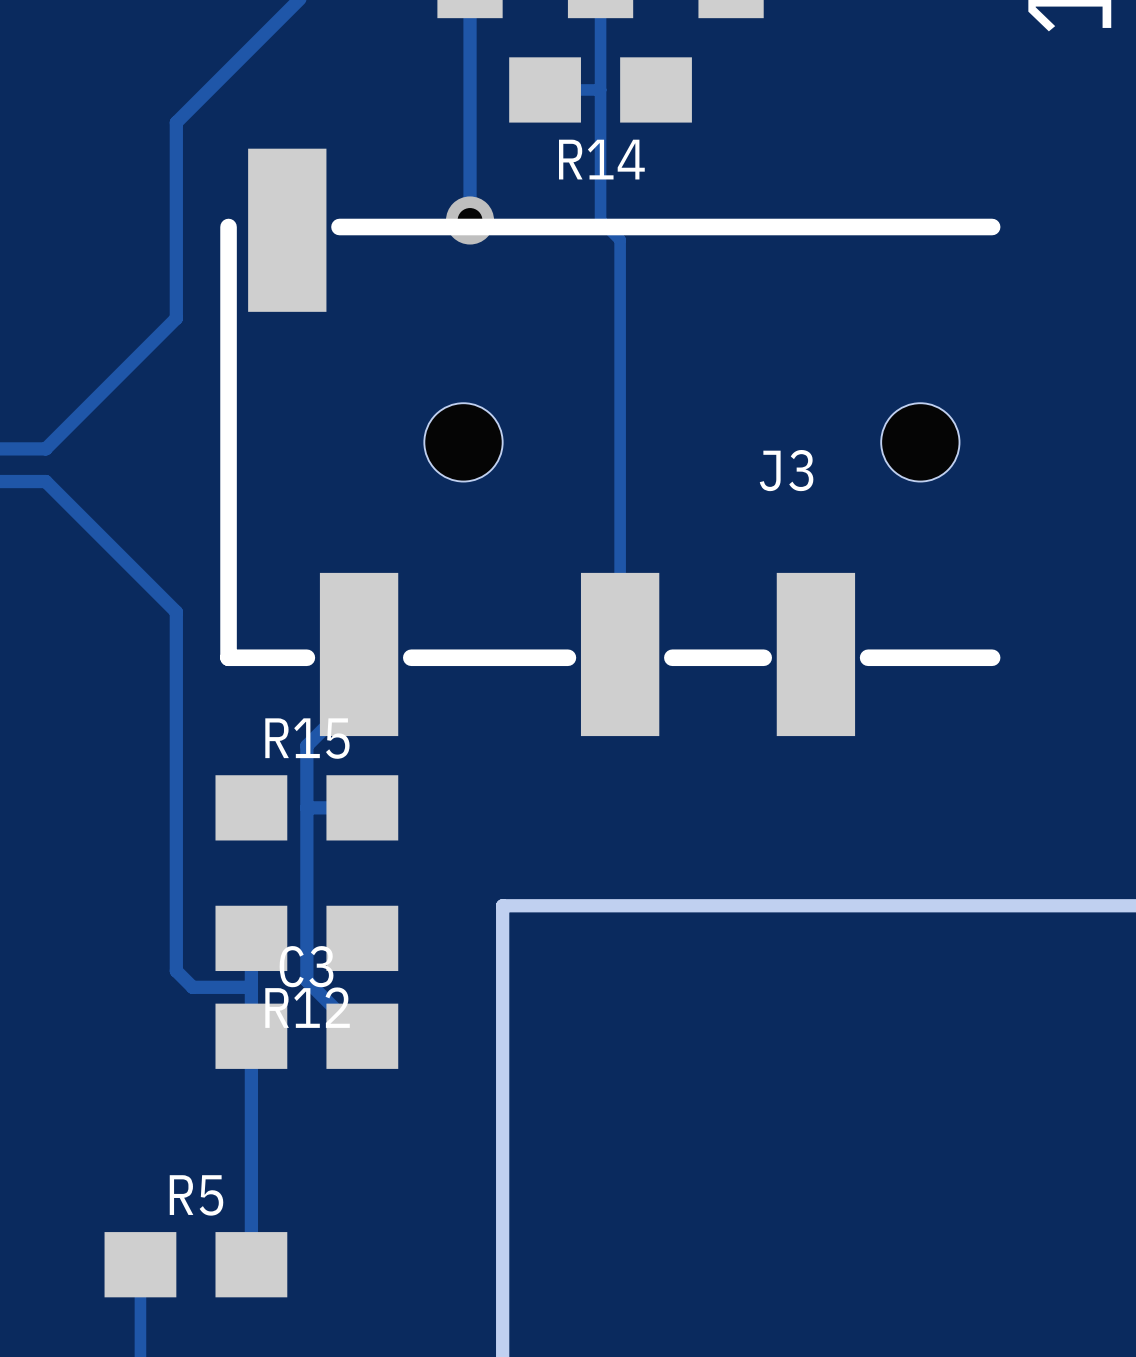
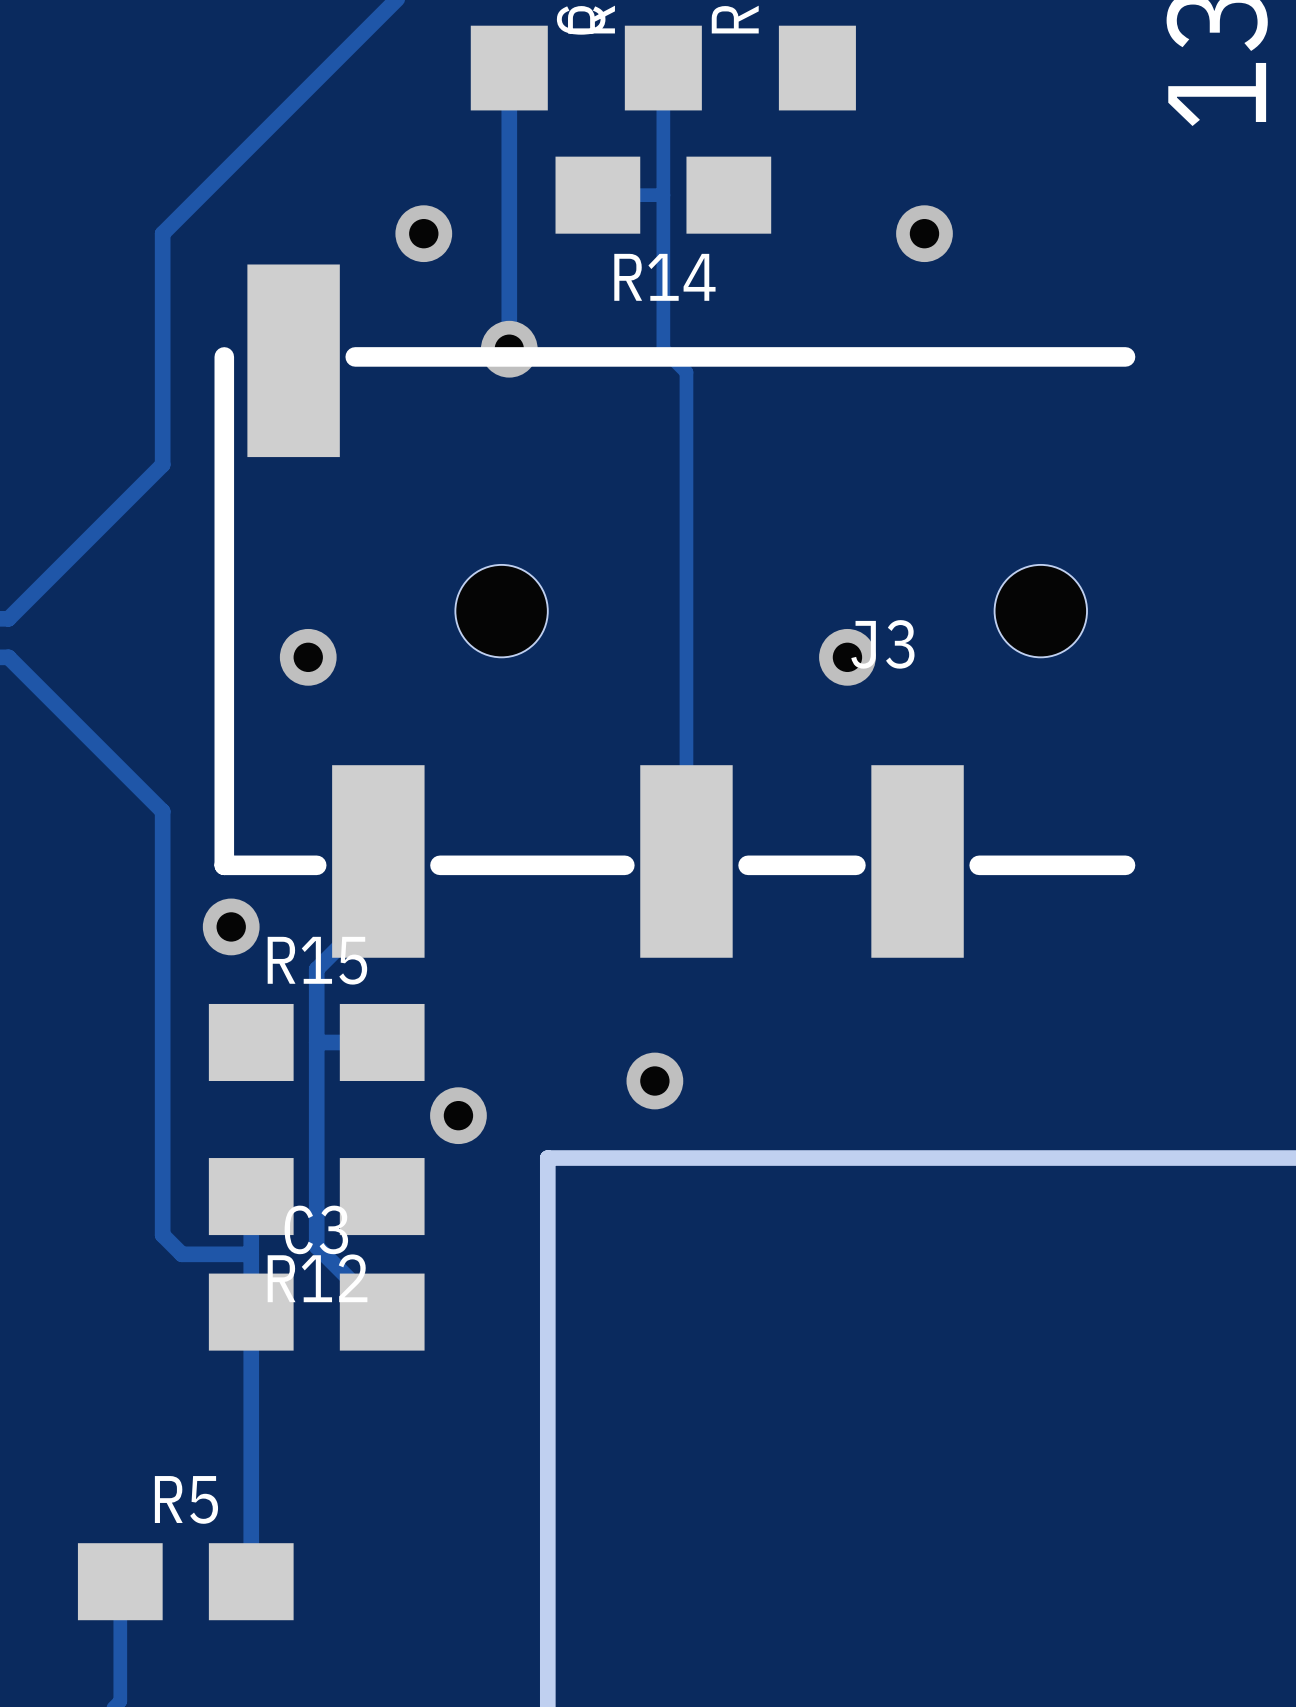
via: none -> (423, 233)
via: none -> (924, 233)
via: none -> (308, 657)
via: none -> (847, 657)
via: none -> (231, 926)
via: none -> (654, 1081)
via: none -> (458, 1115)

